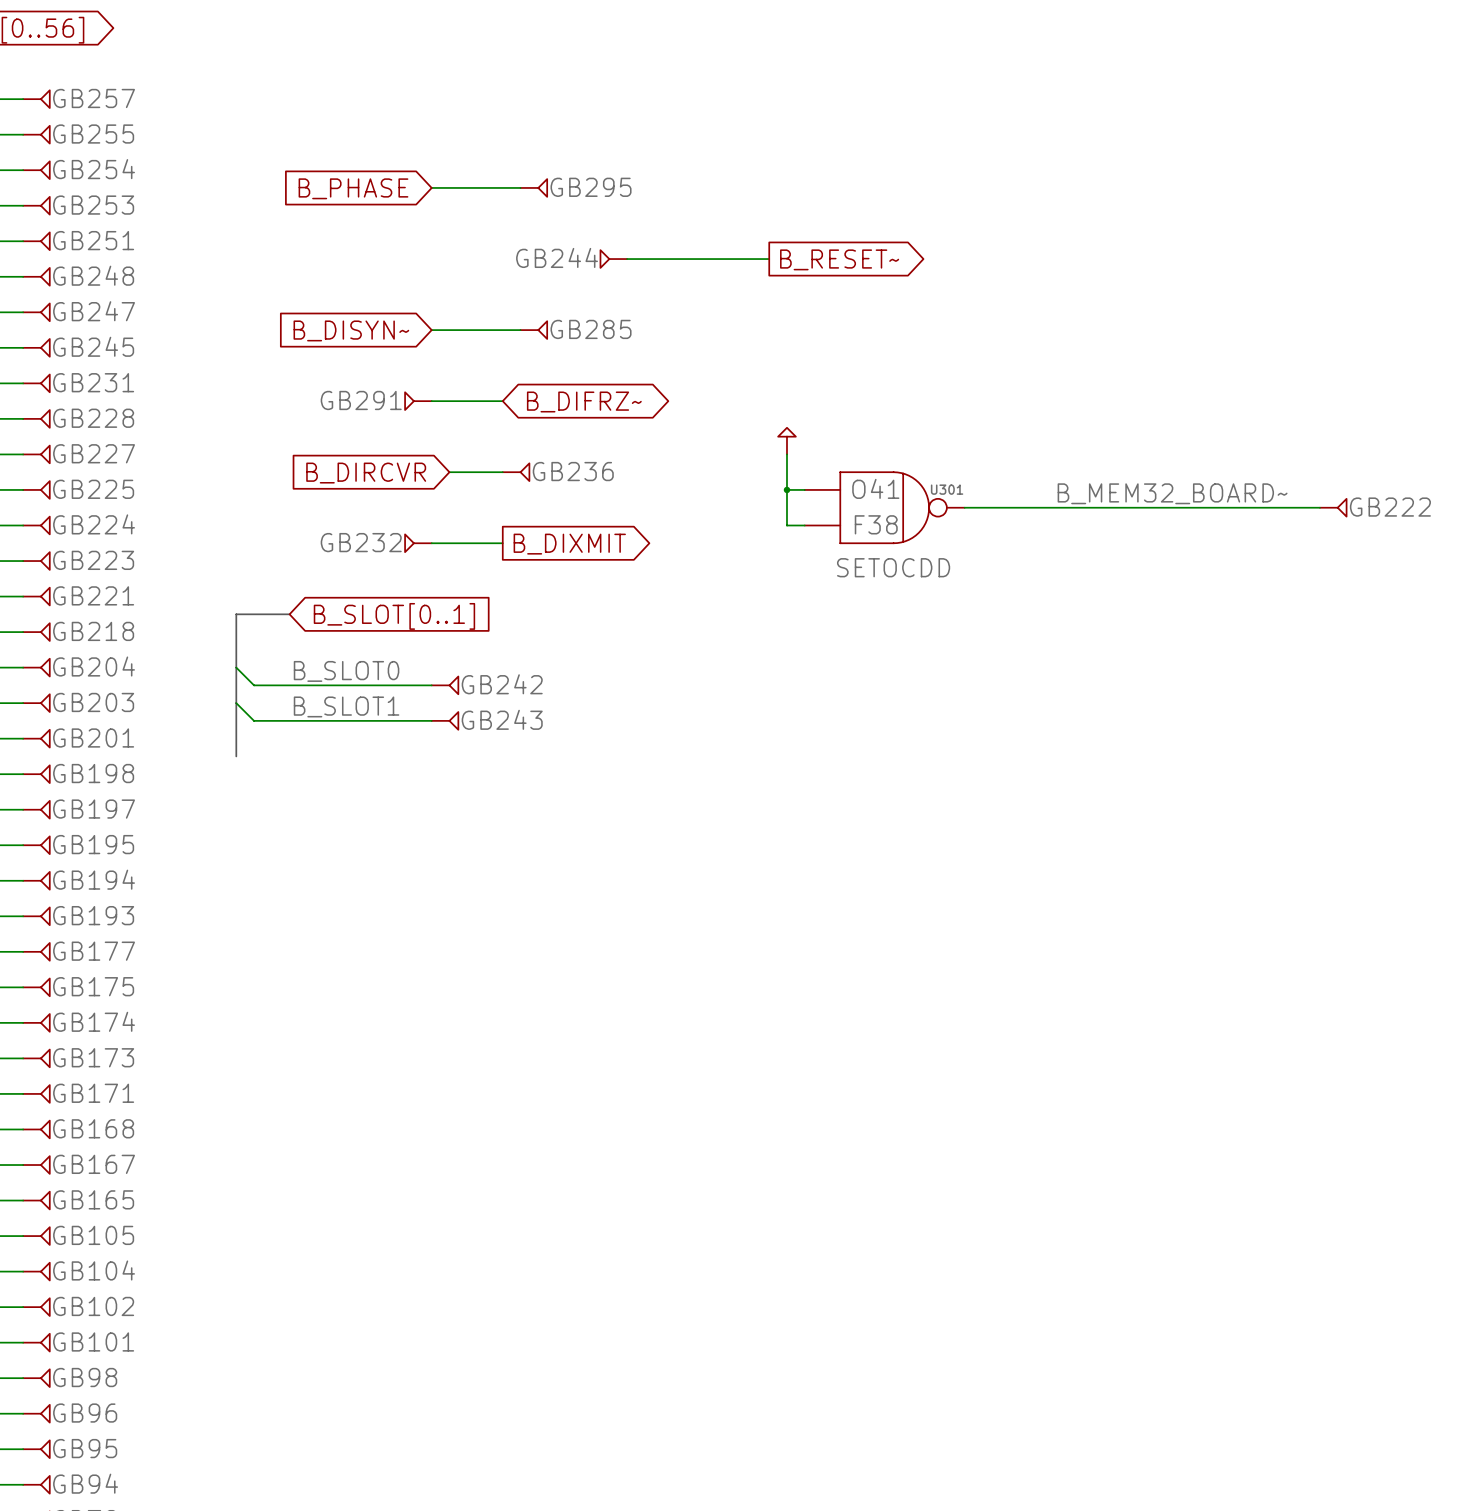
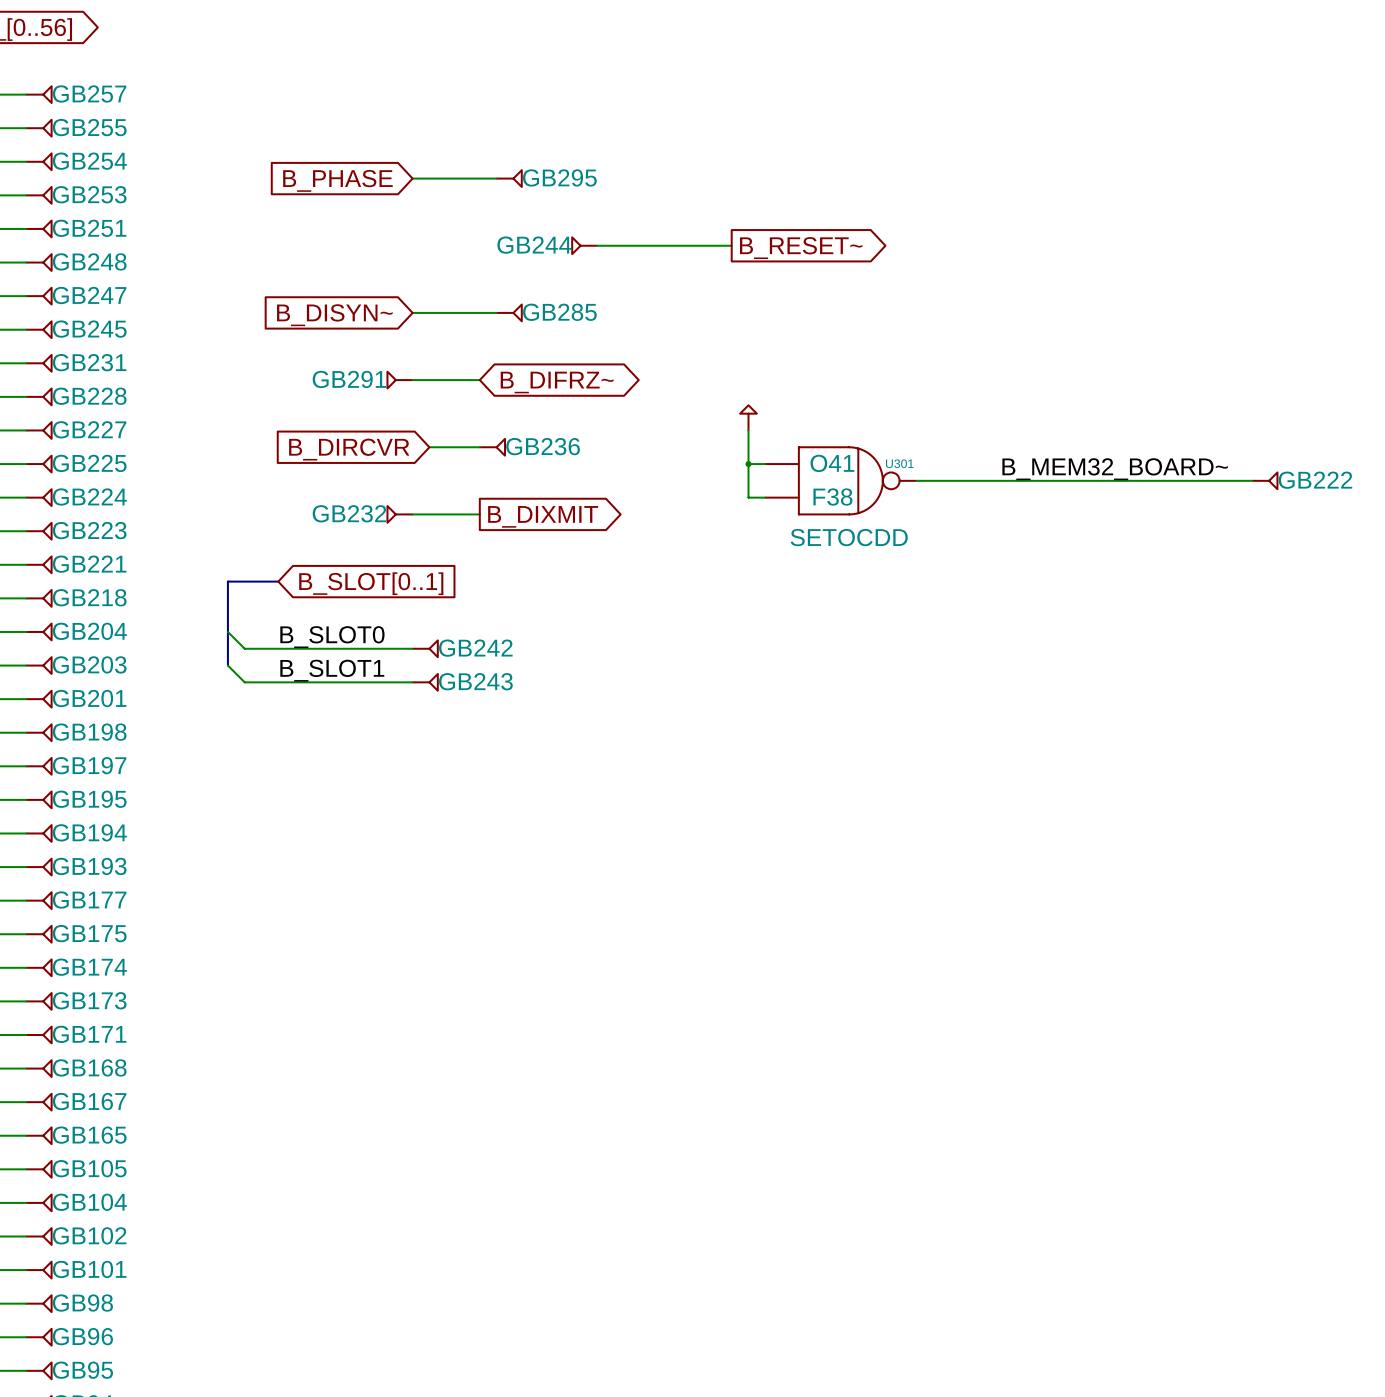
bus: (236, 703) (236, 756) -> none

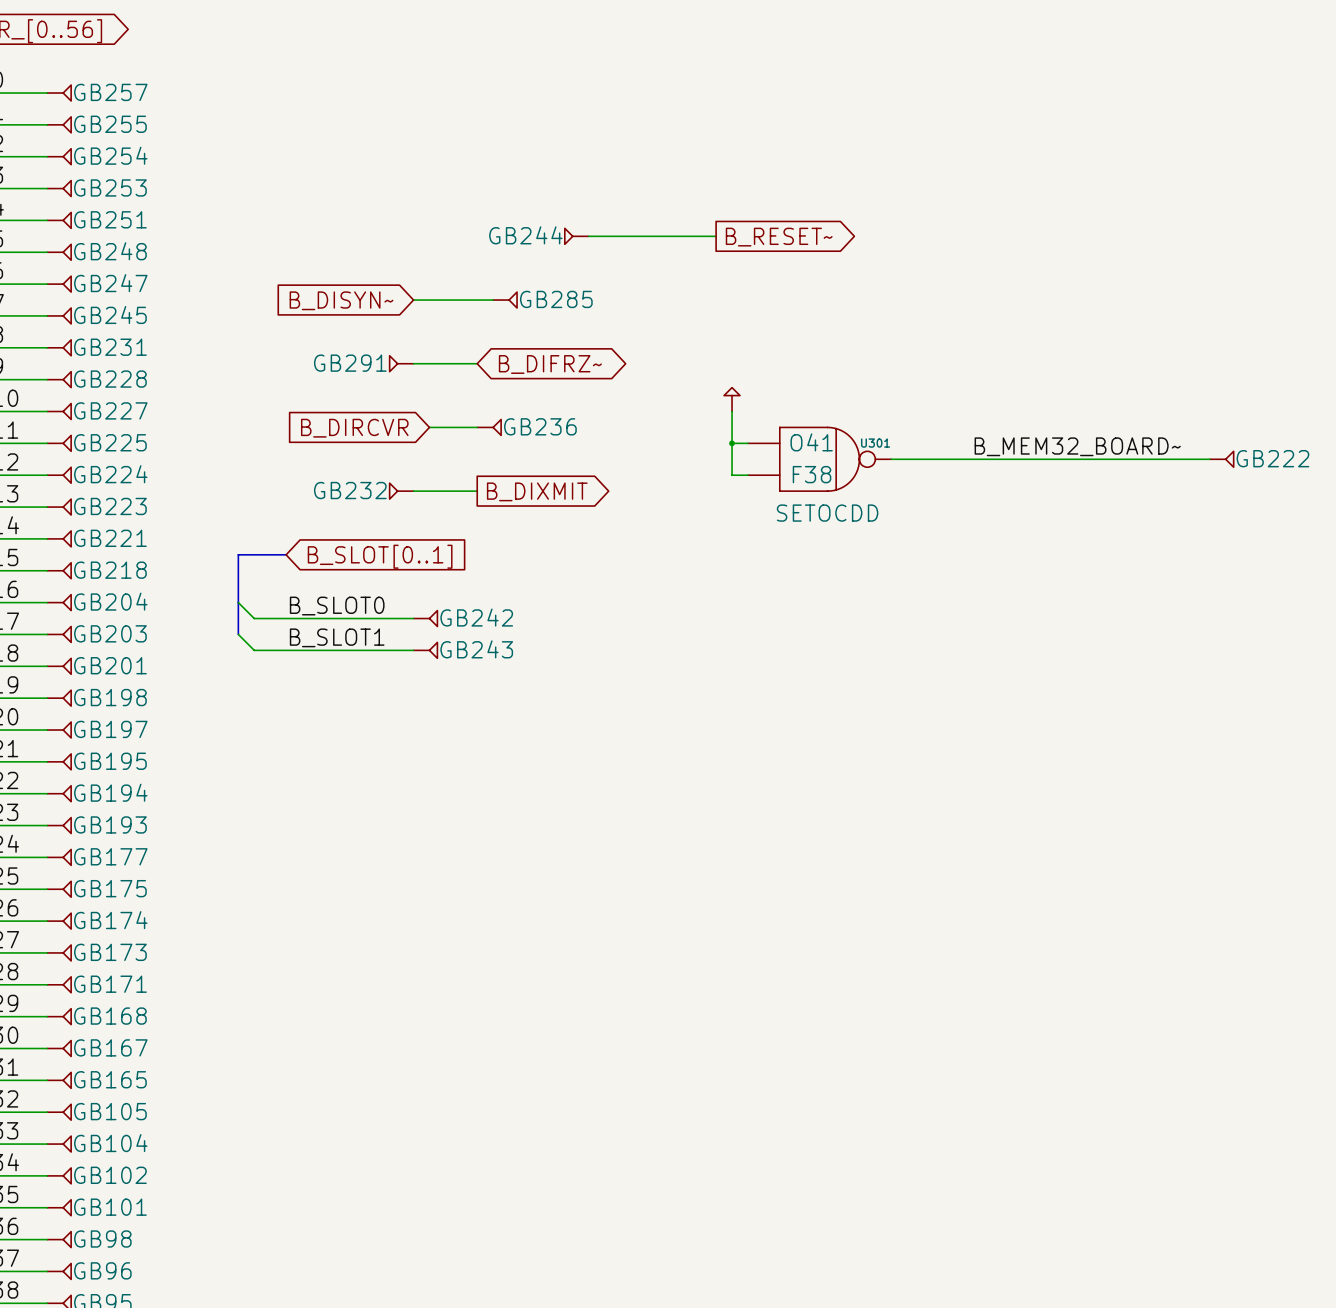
wire: (412, 178) (496, 178) -> none
GB295: (509, 178) -> none
global label: B_PHASE (337, 180) -> none

